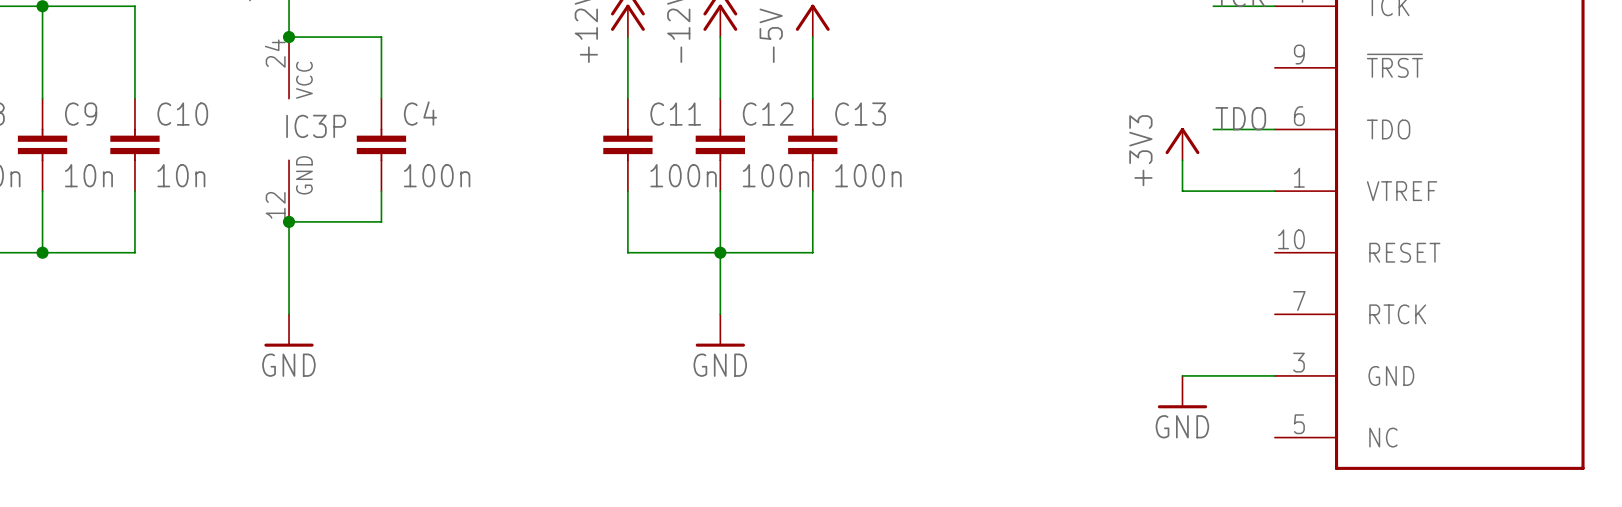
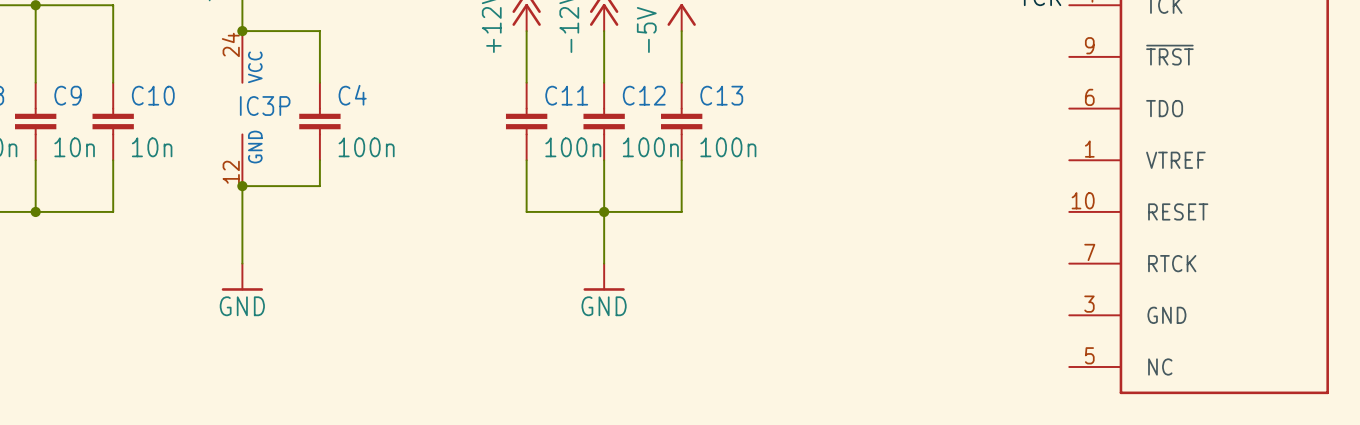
wire: (1213, 6) (1274, 6) -> none
label: TDO (1240, 118) -> none
wire: (1213, 129) (1274, 129) -> none
power symbol: +3V3 (1182, 144) -> none
wire: (1182, 160) (1182, 191) (1274, 191) -> none
wire: (1182, 375) (1274, 375) -> none
power symbol: GND (1182, 392) -> none

